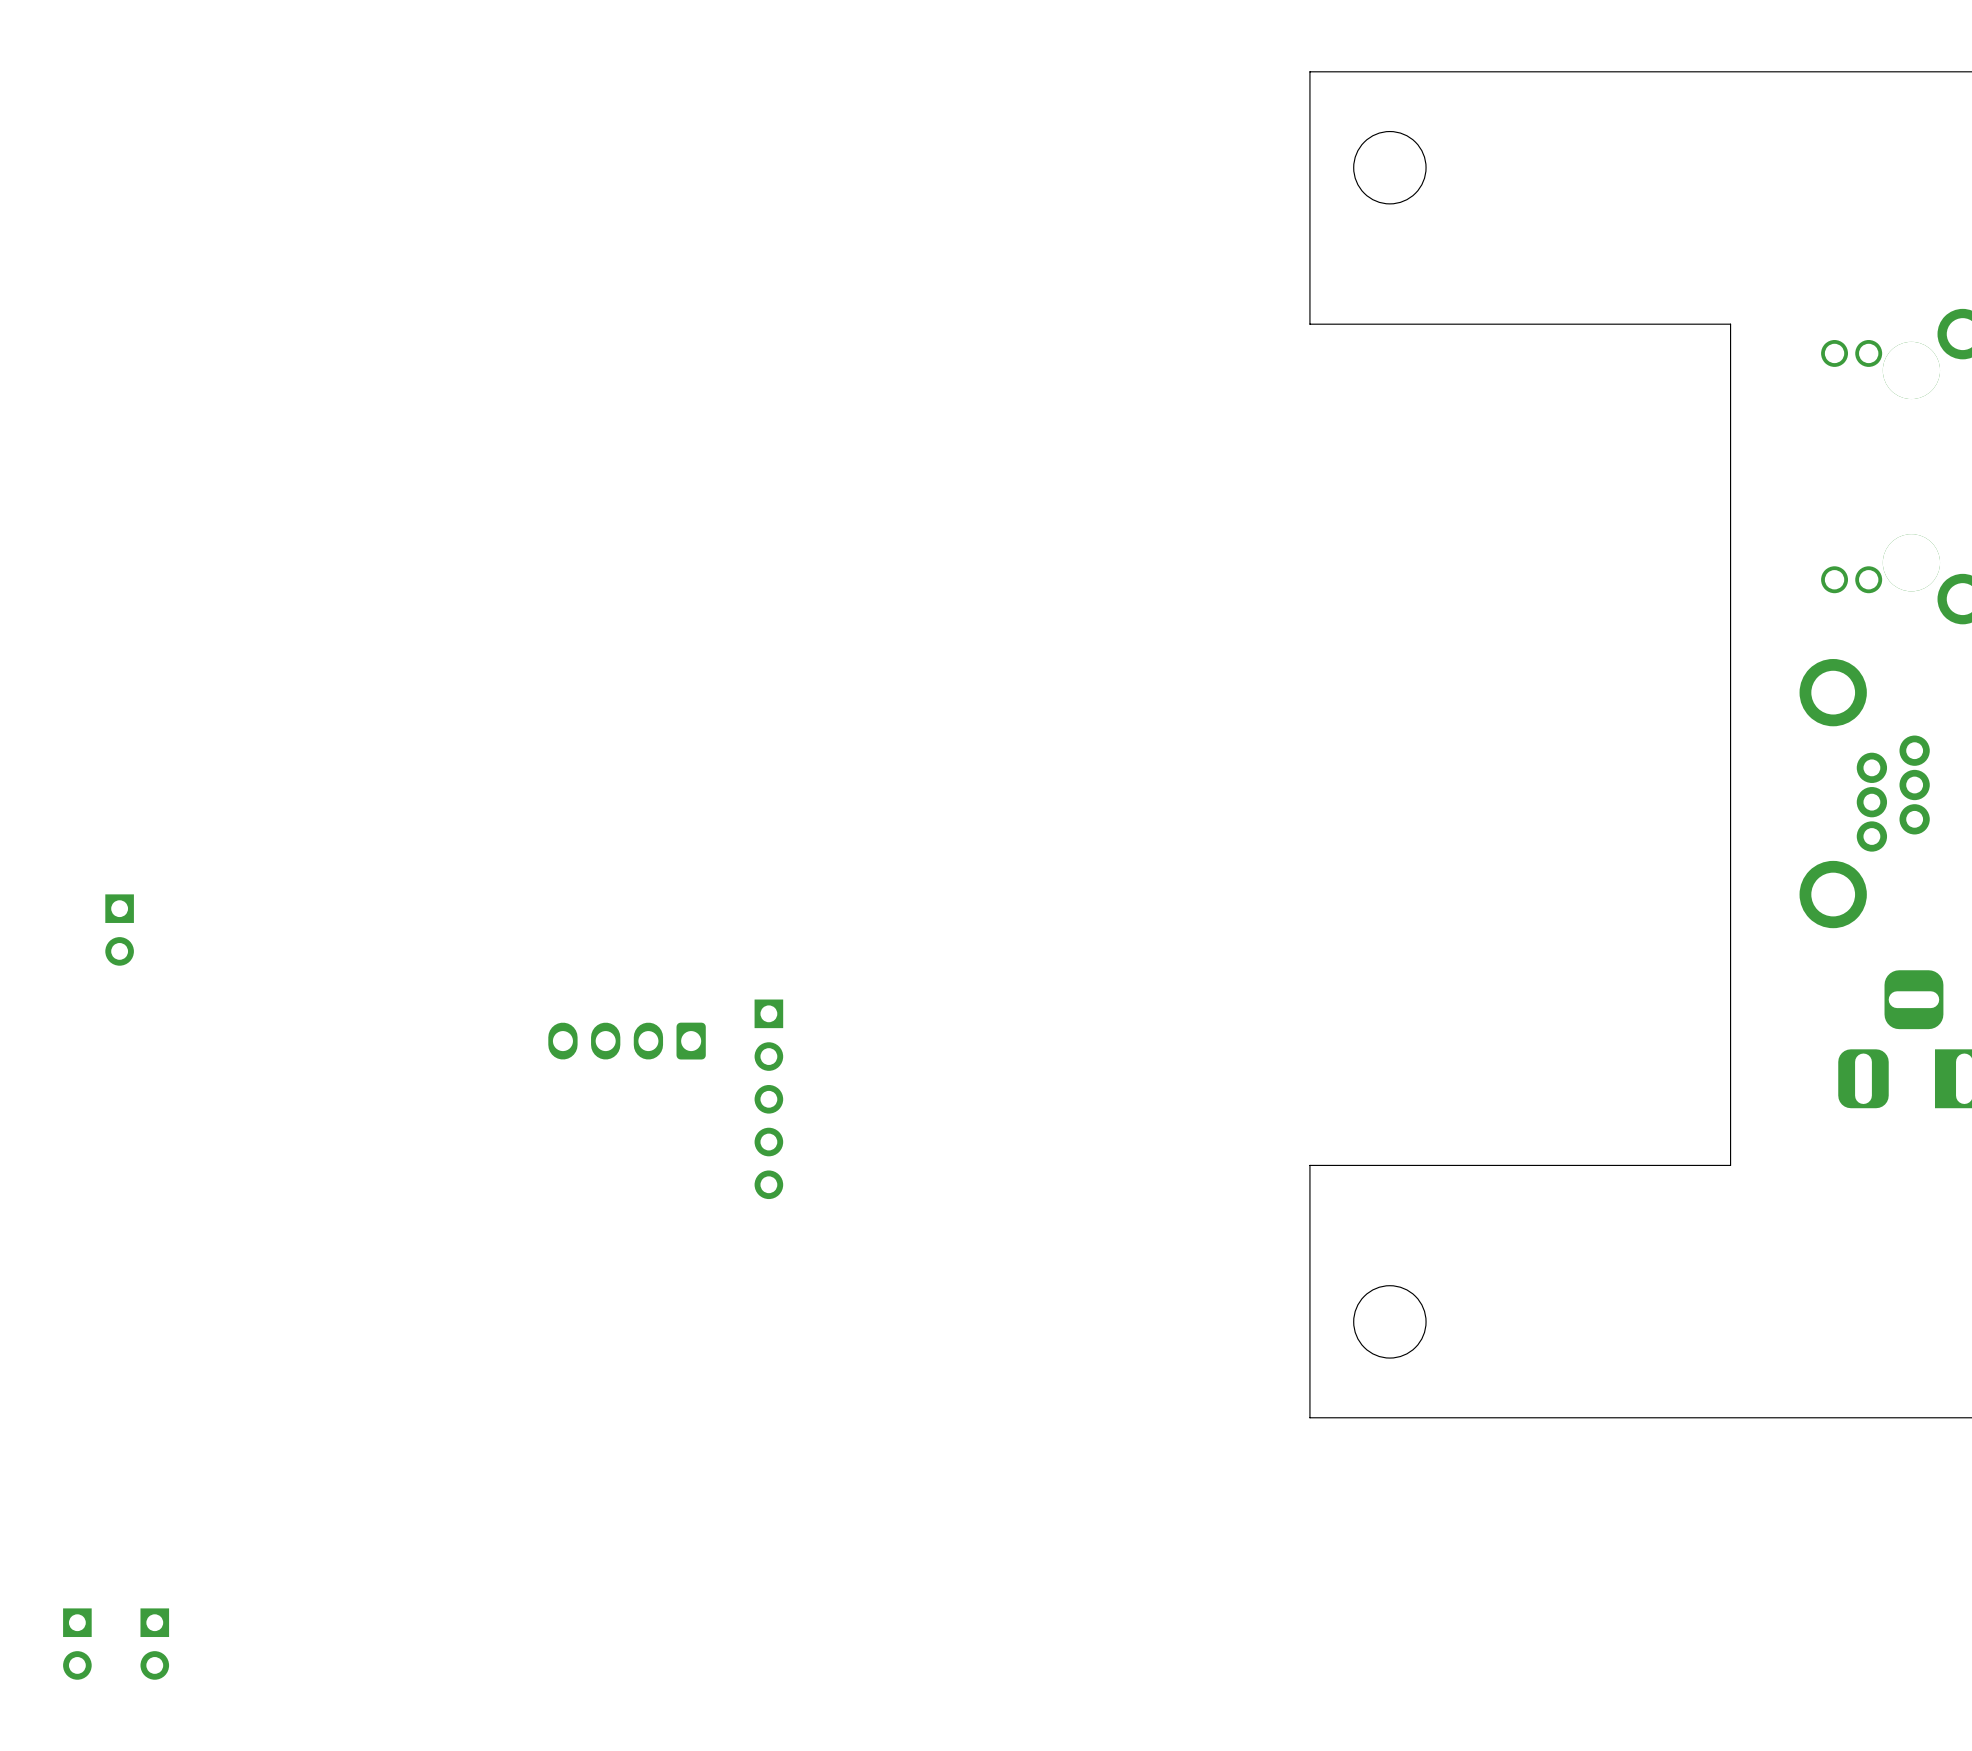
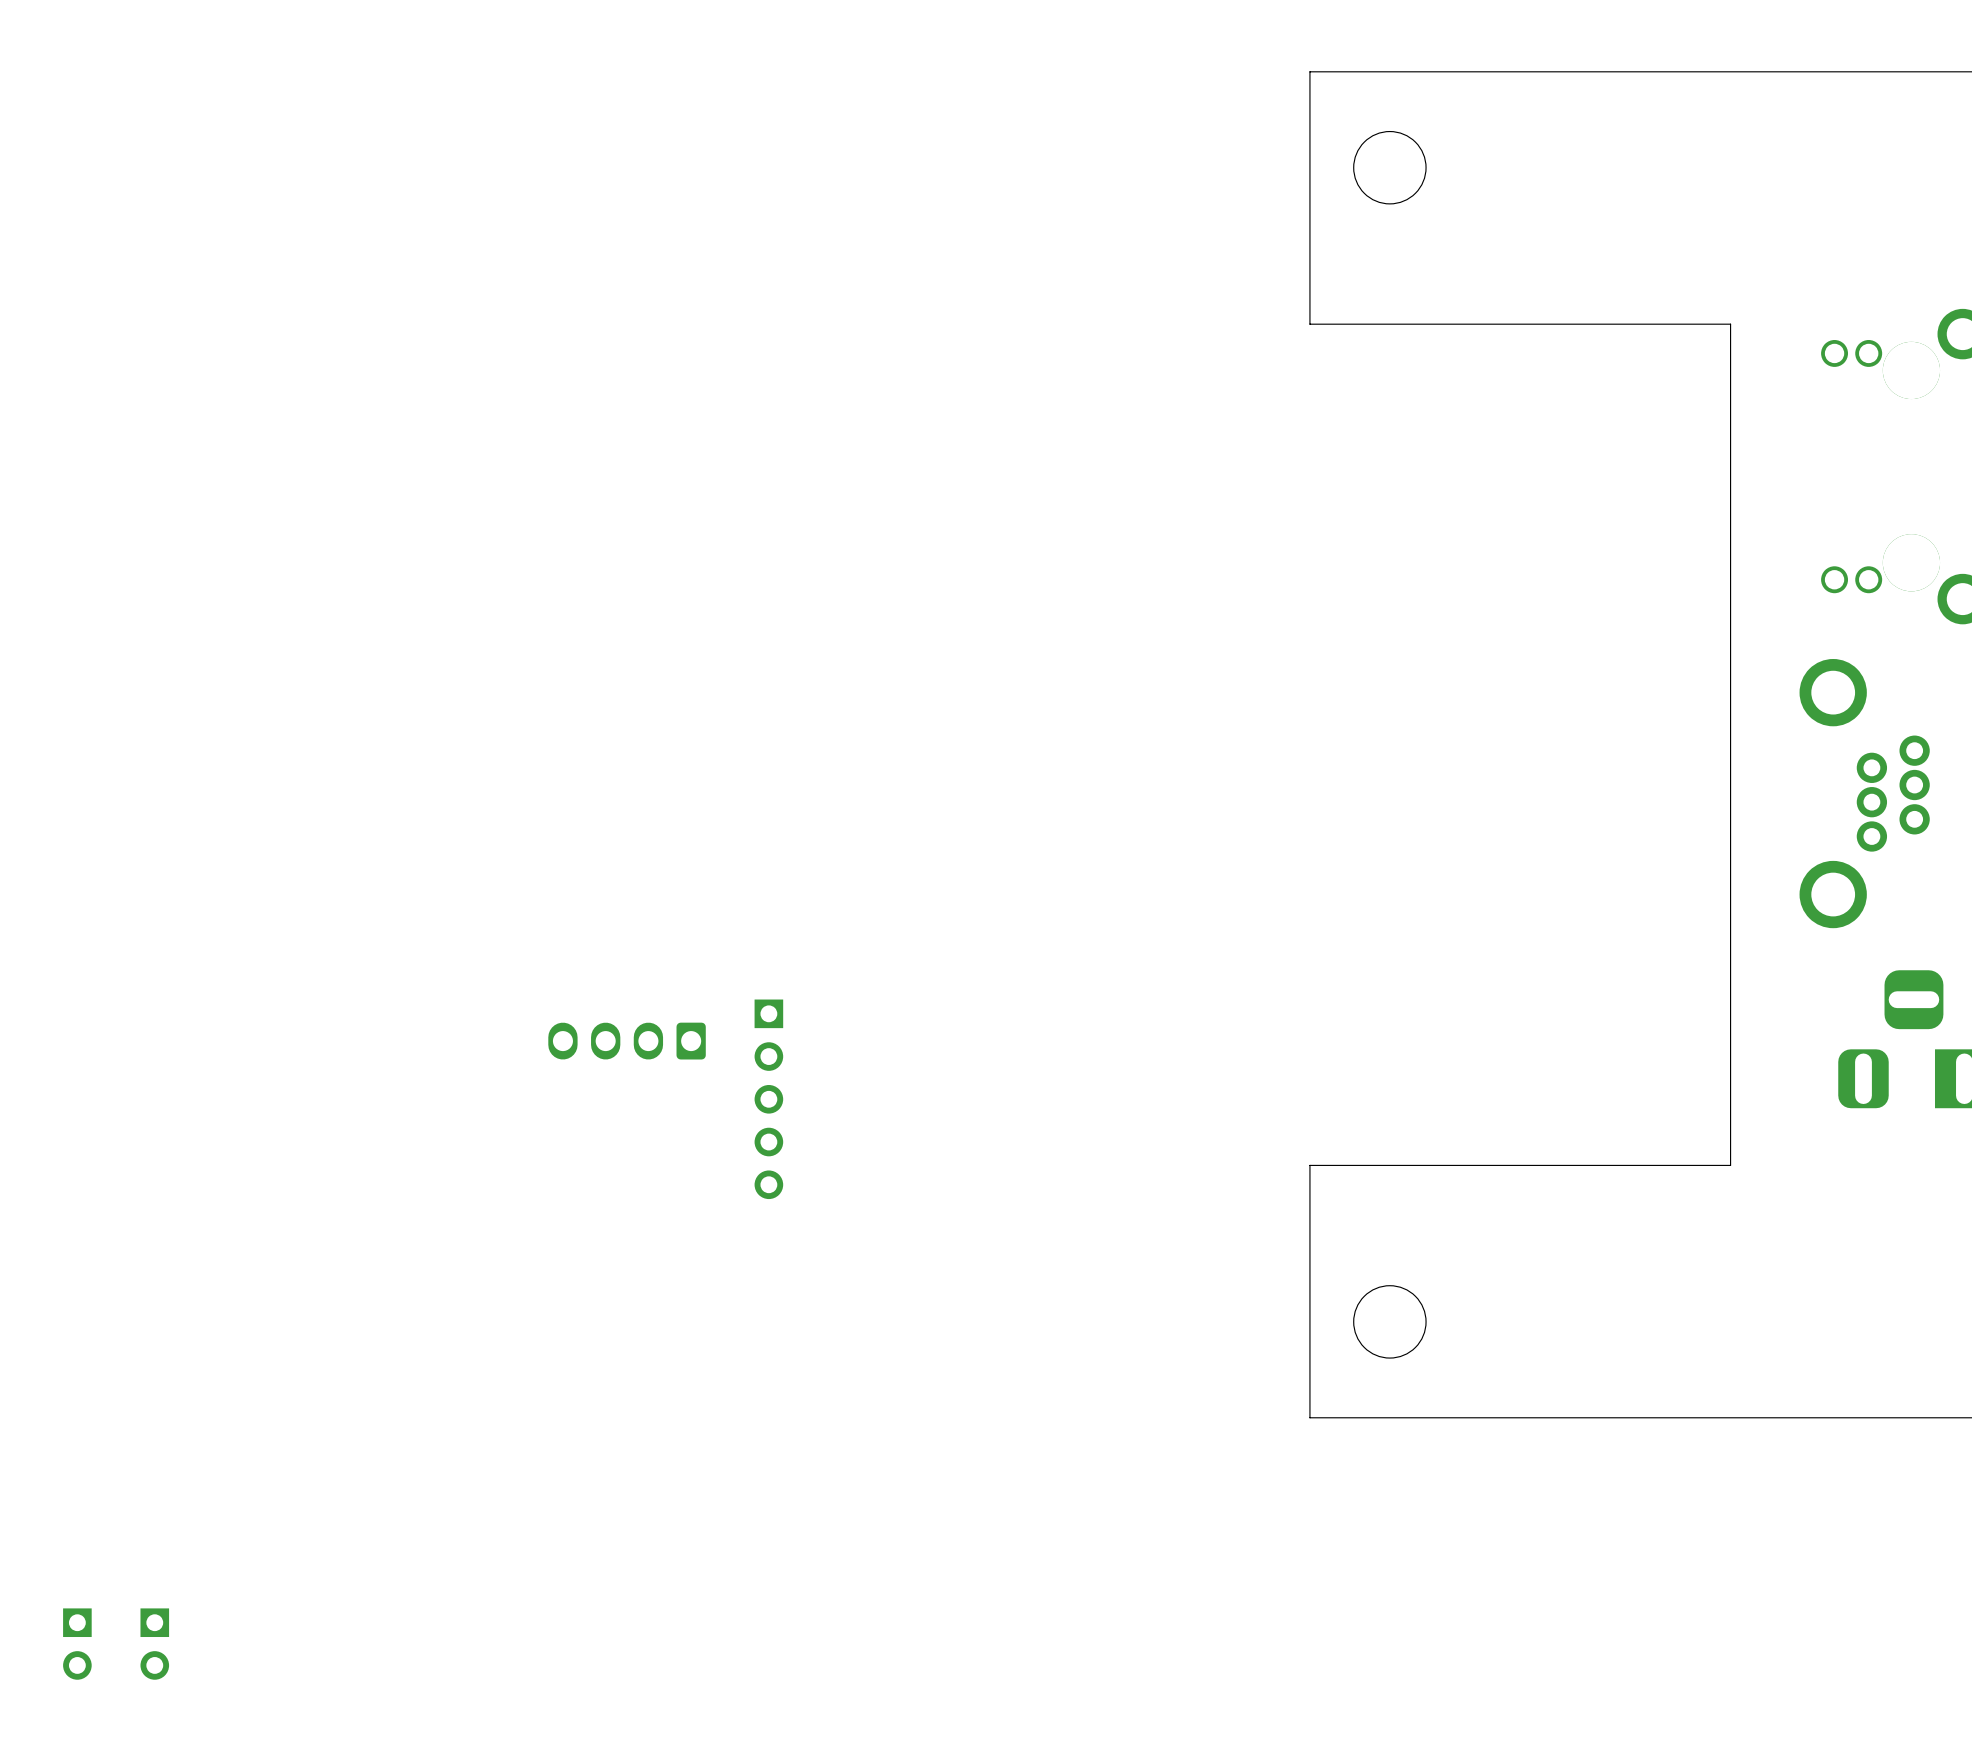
part: (119, 930) -> none

